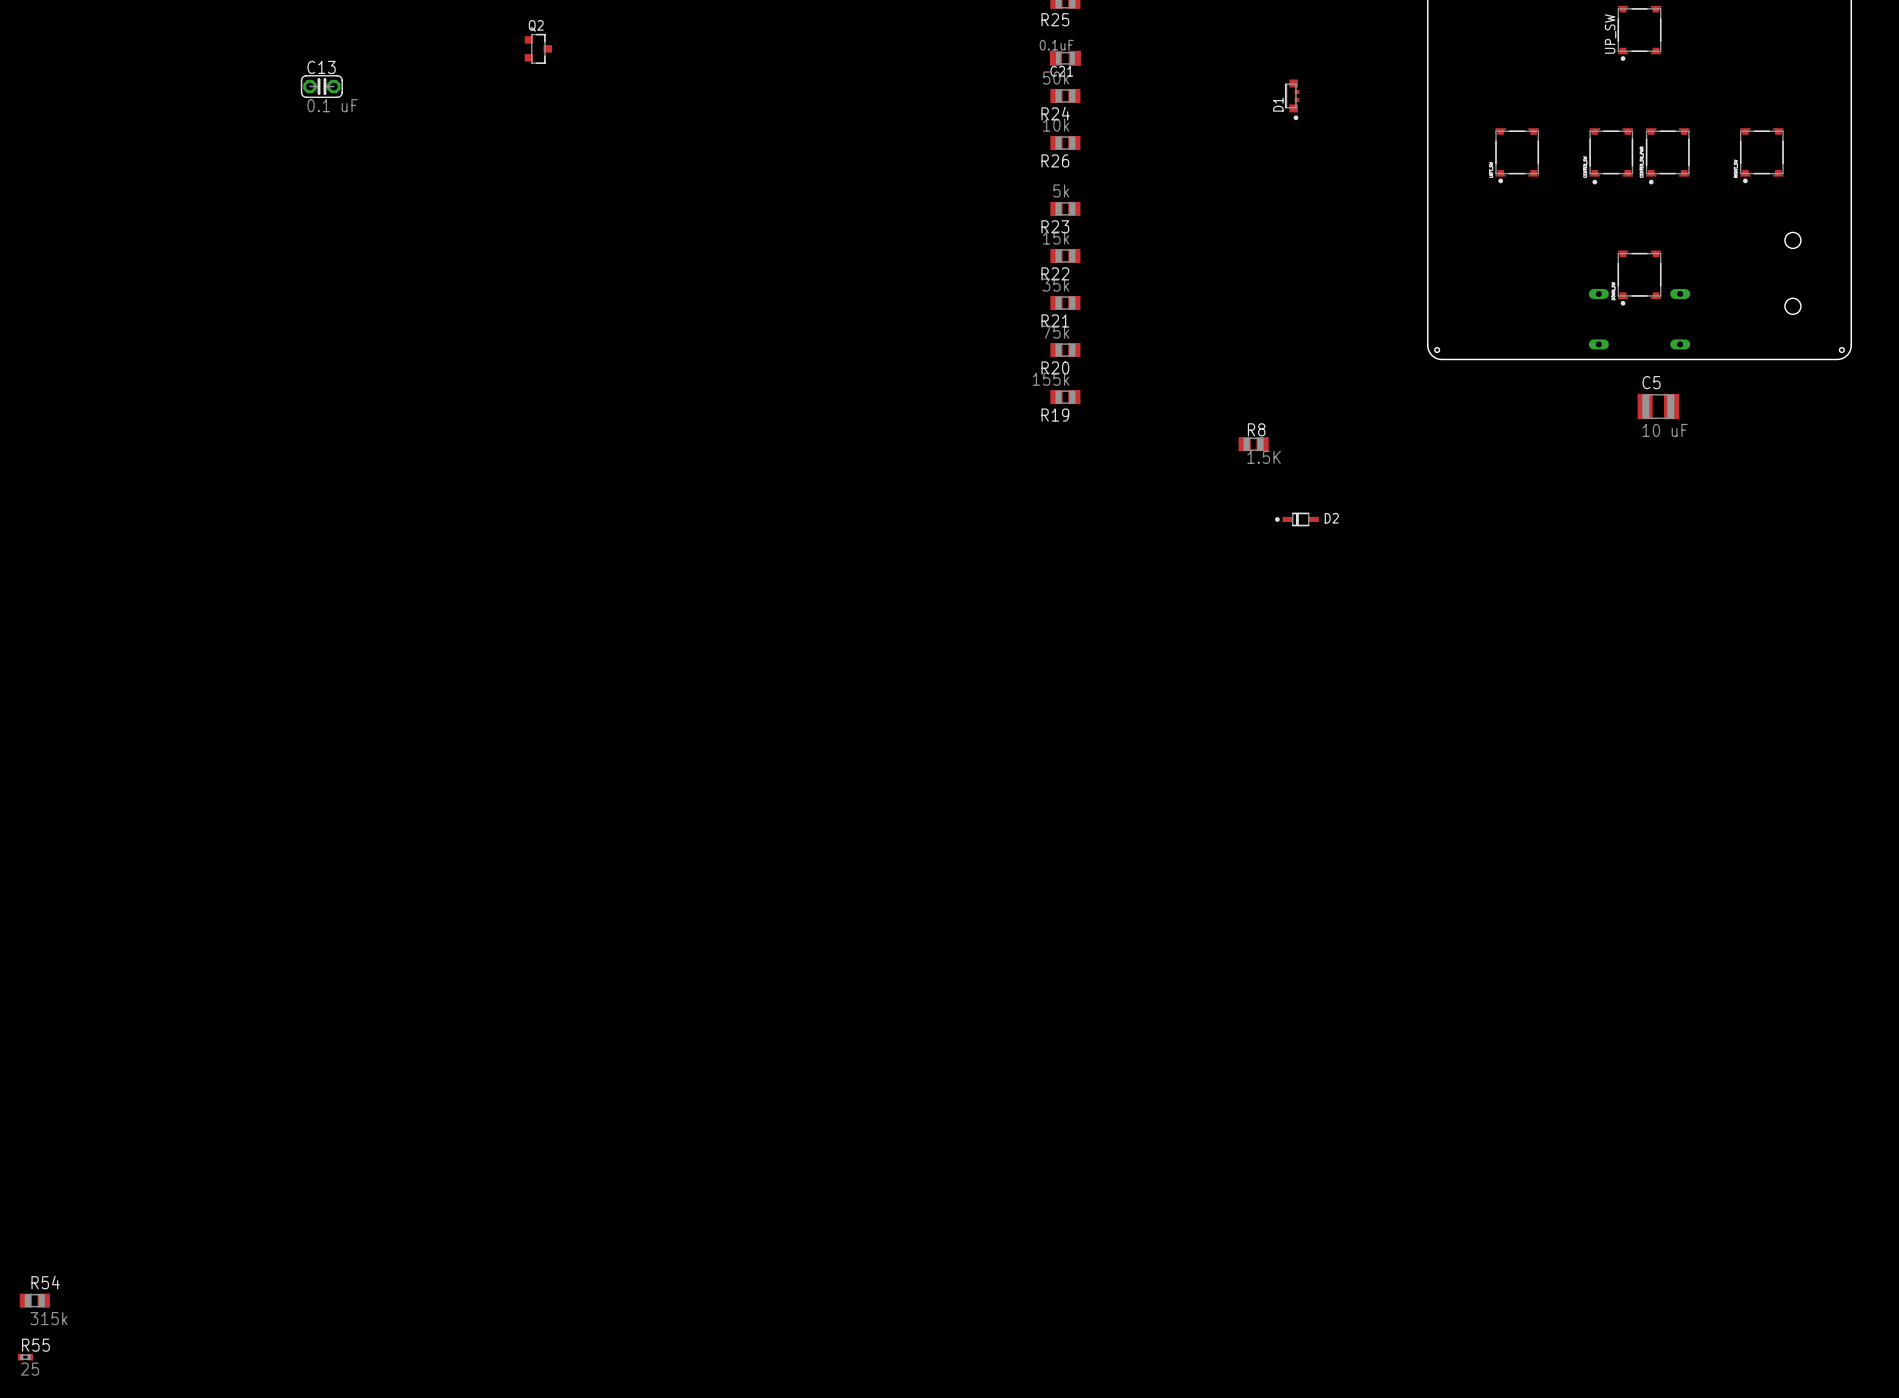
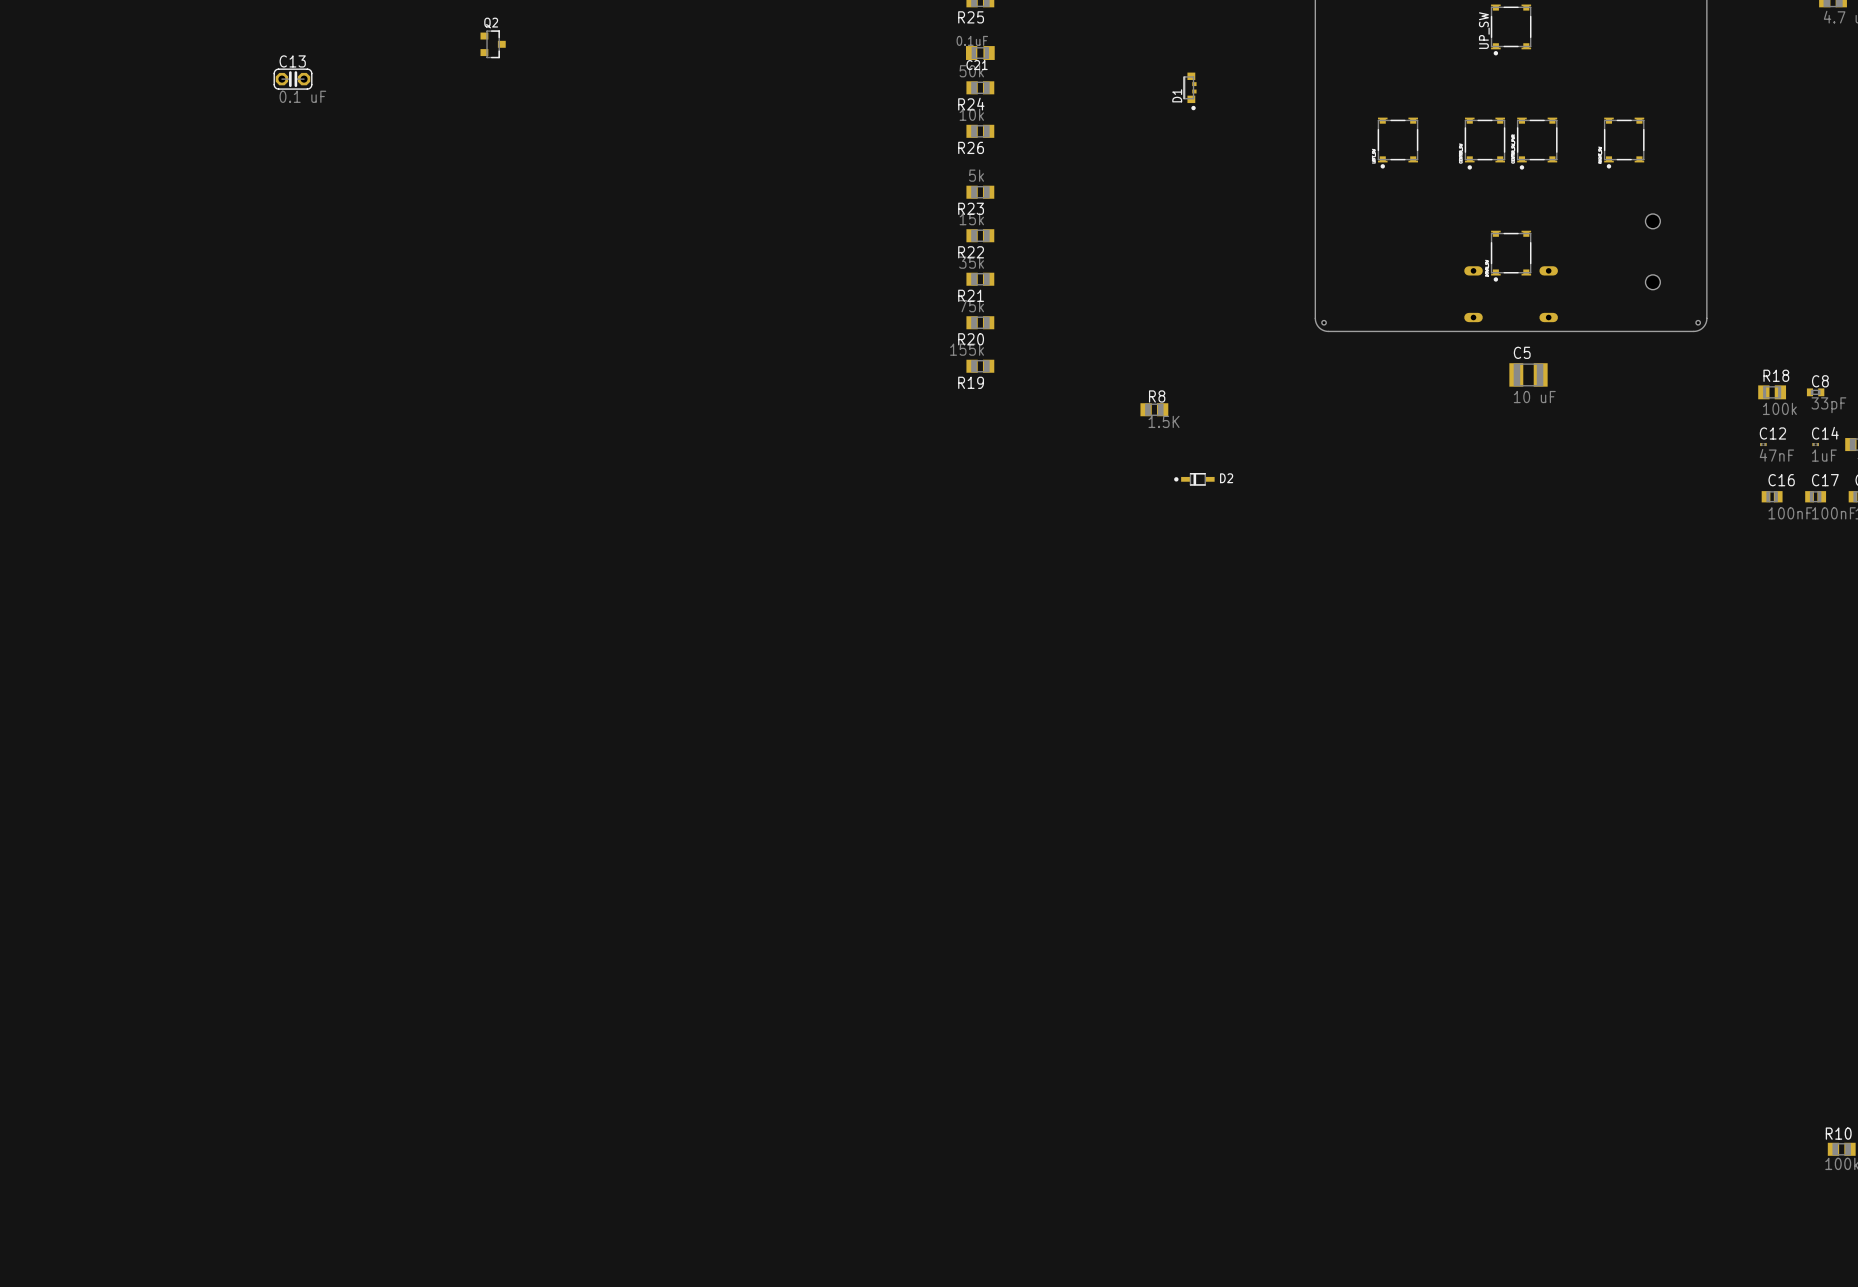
R54: 315k (34, 1300) -> none
R55: 25 (25, 1357) -> none

